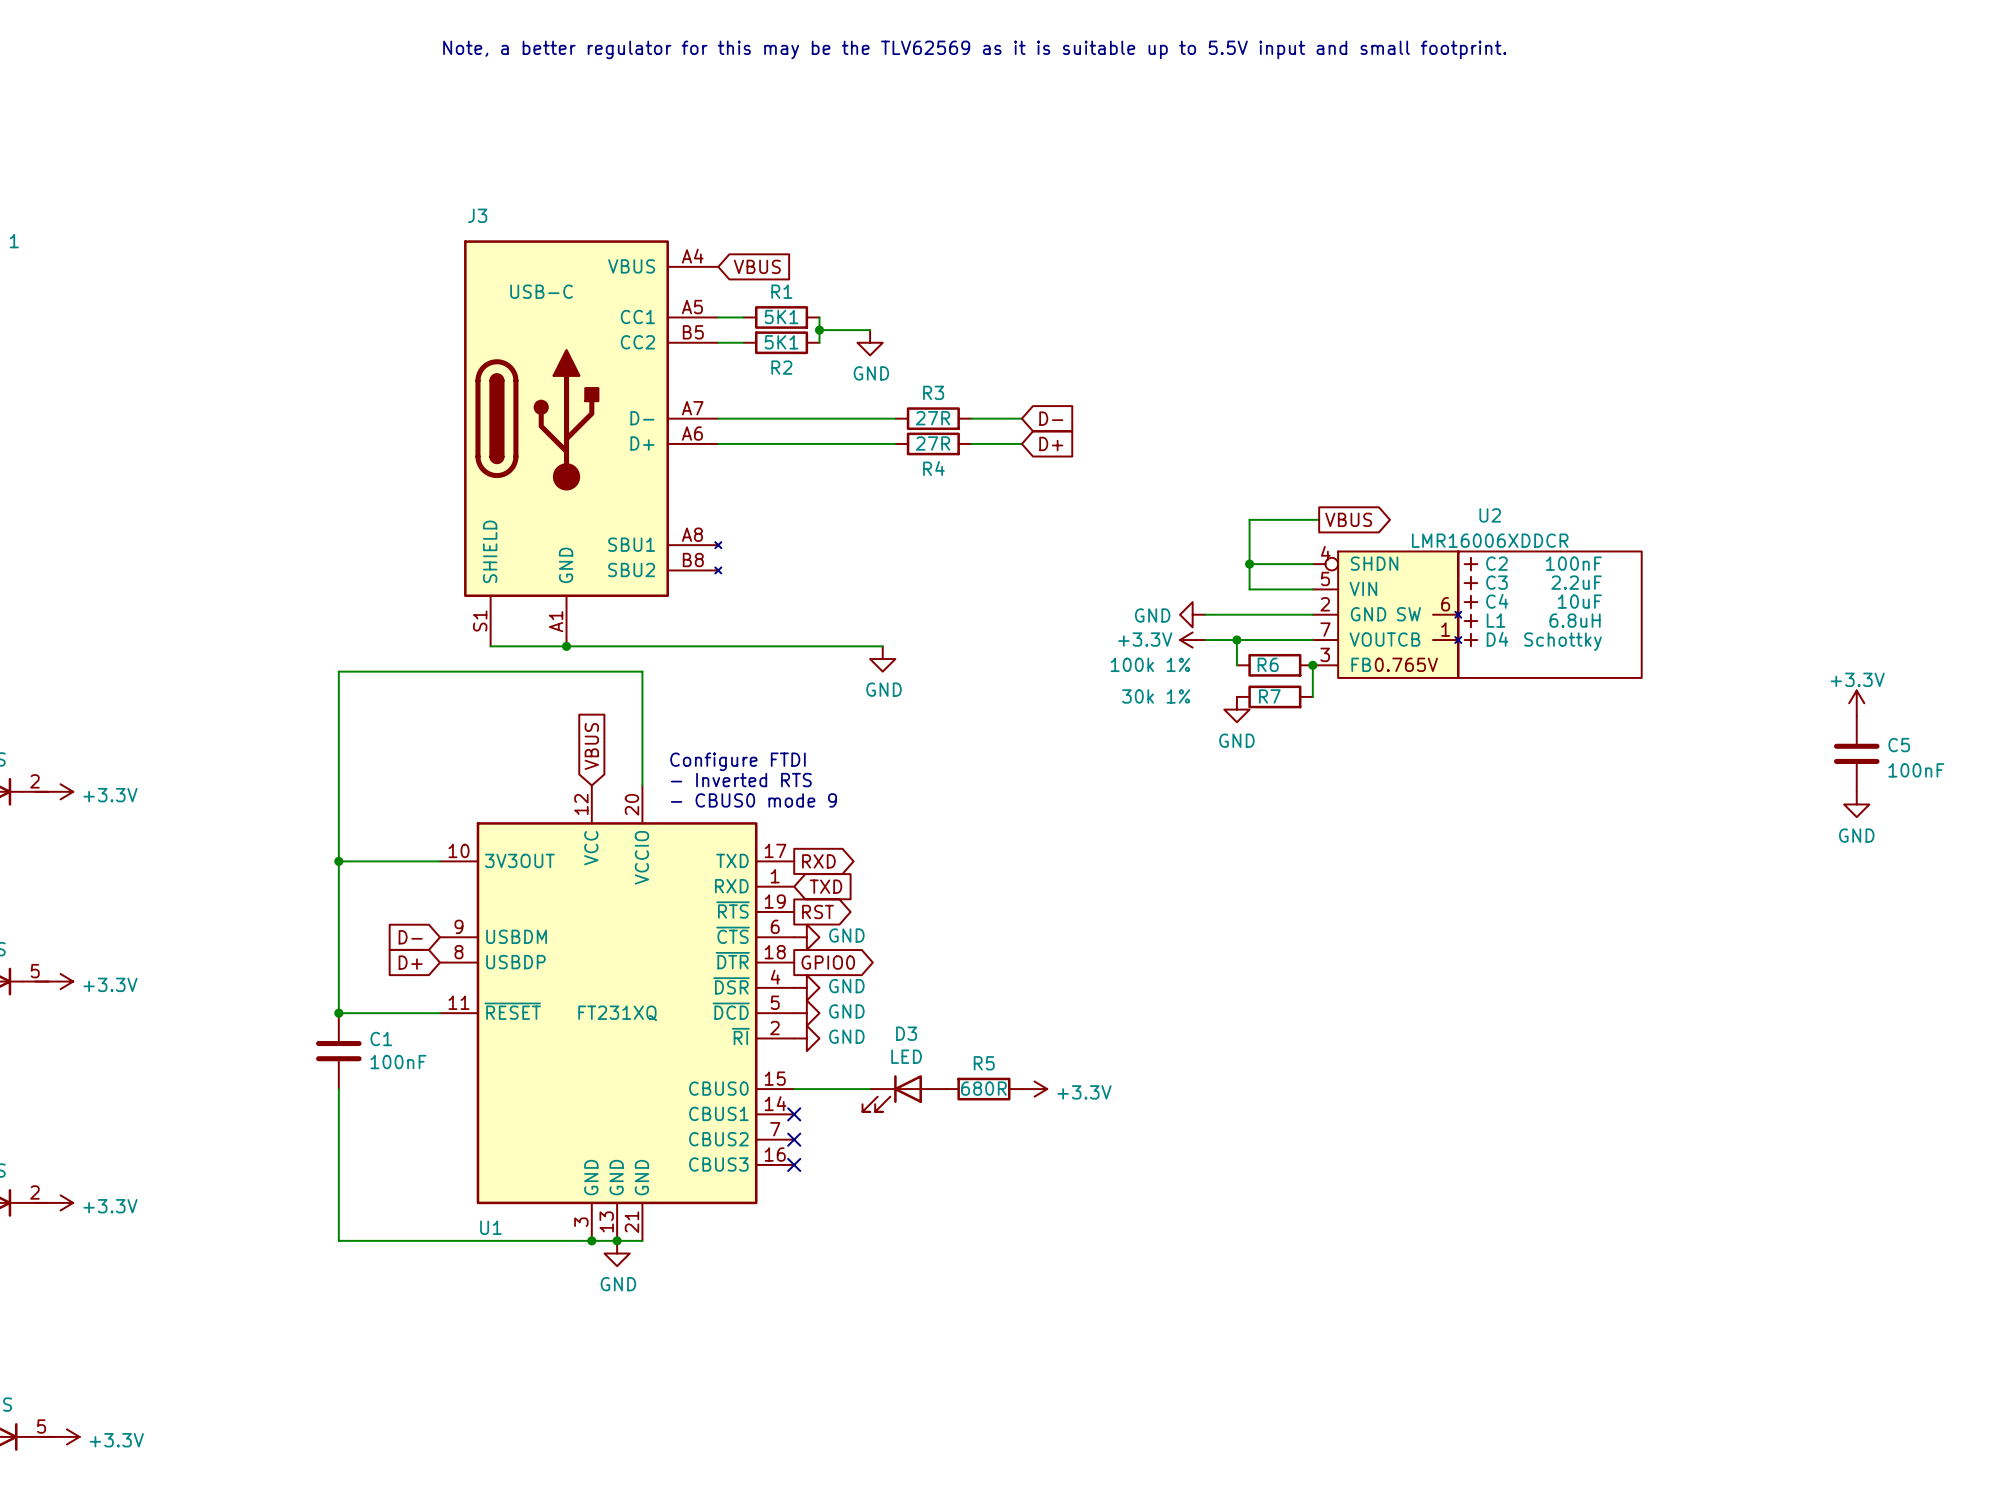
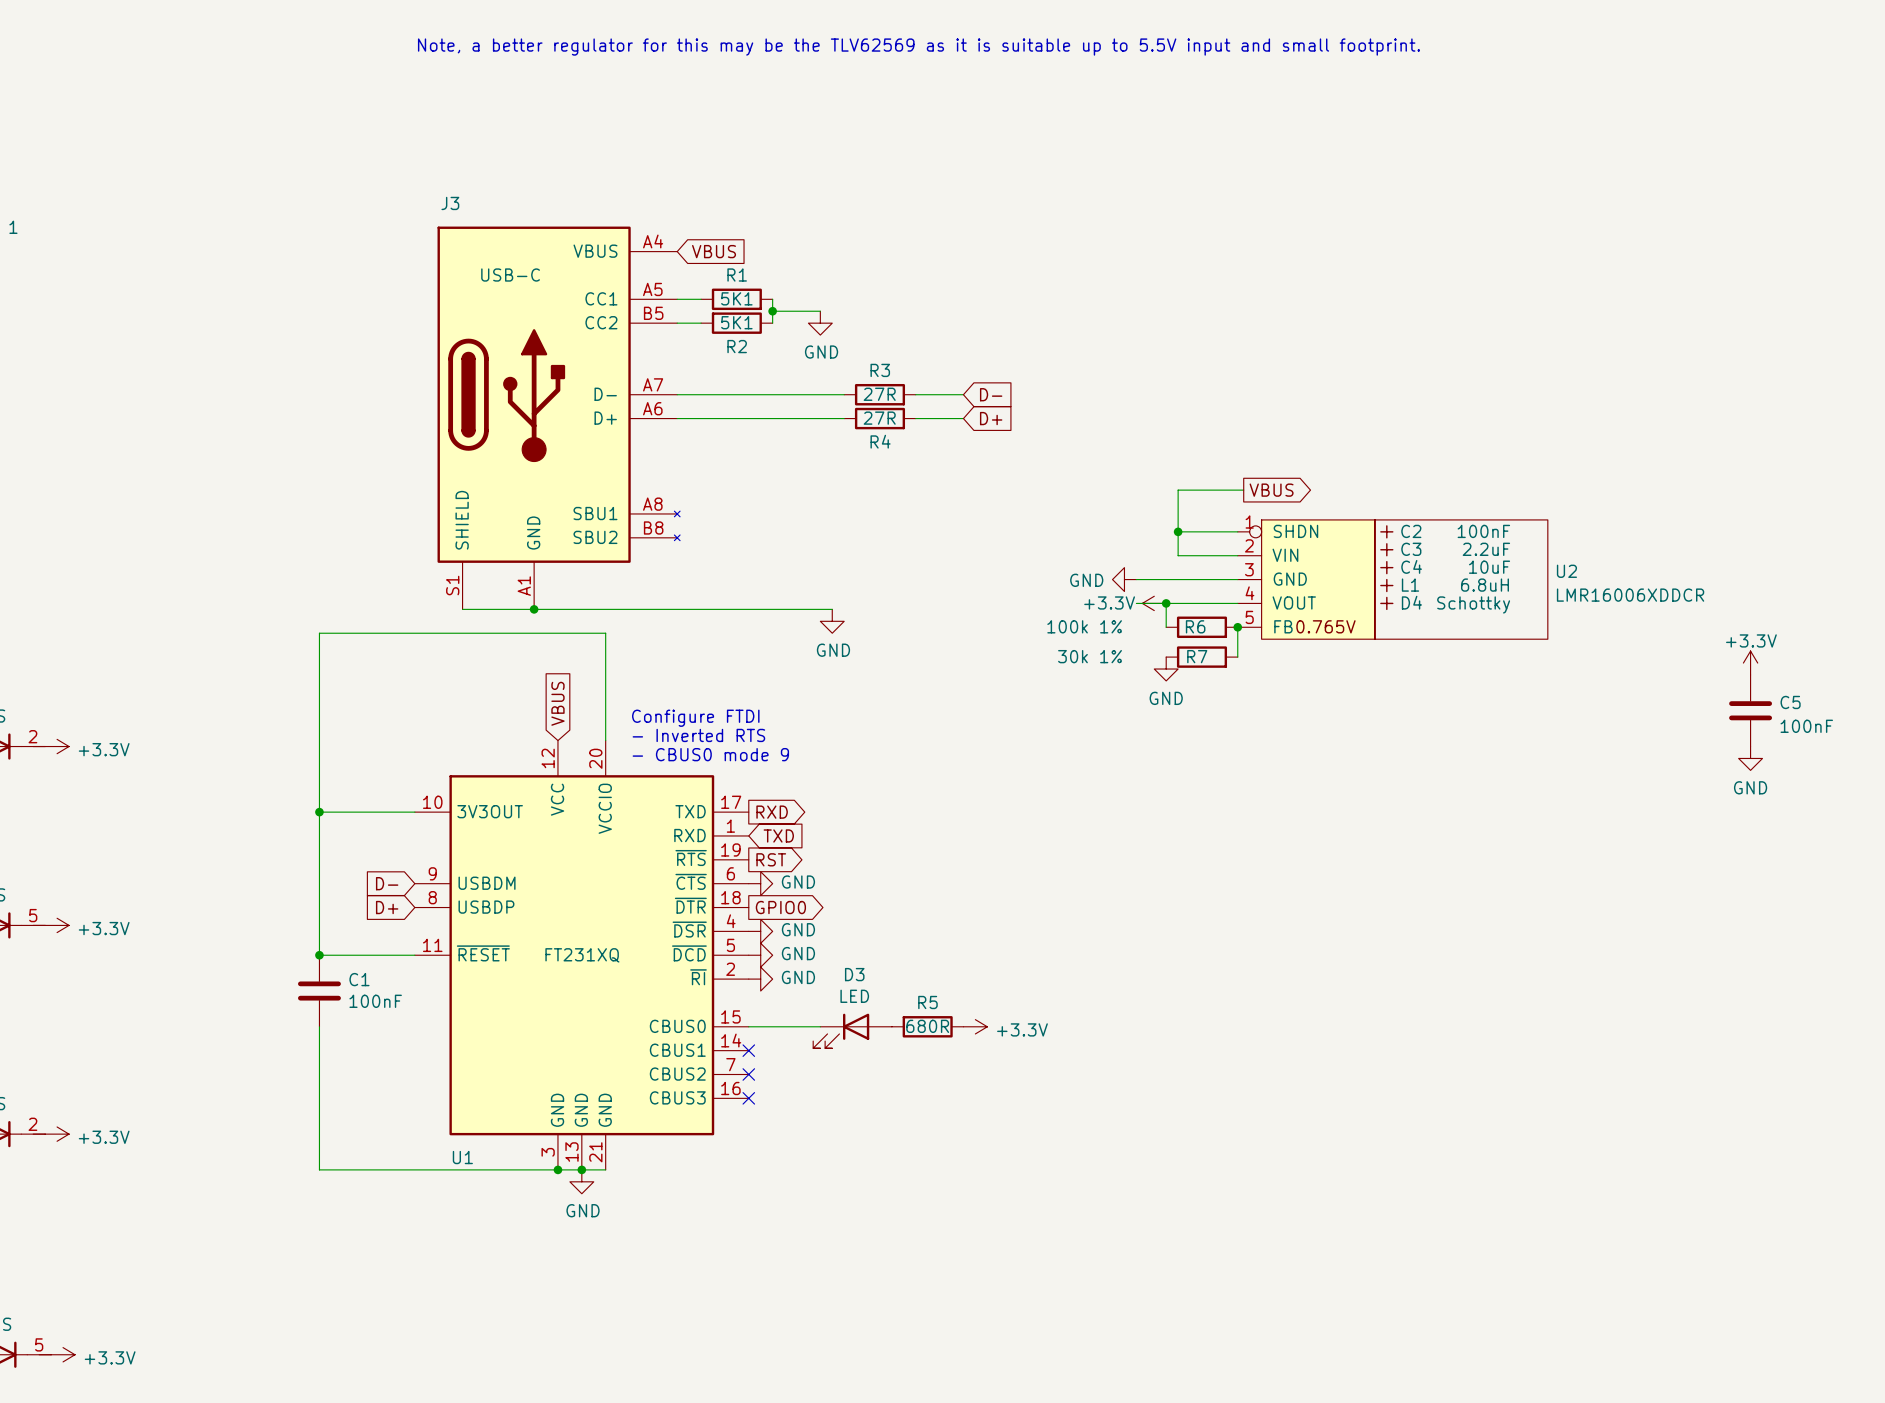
U2 name position: U2 (1490, 515) -> U2 (1566, 571)
U2 value position: LMR16006XDDCR (1490, 540) -> LMR16006XDDCR (1630, 595)
U2 symbol: [1312, 551, 1642, 678] -> [1237, 519, 1548, 640]
power symbol position: +3.3V (1192, 640) -> +3.3V (1154, 603)

